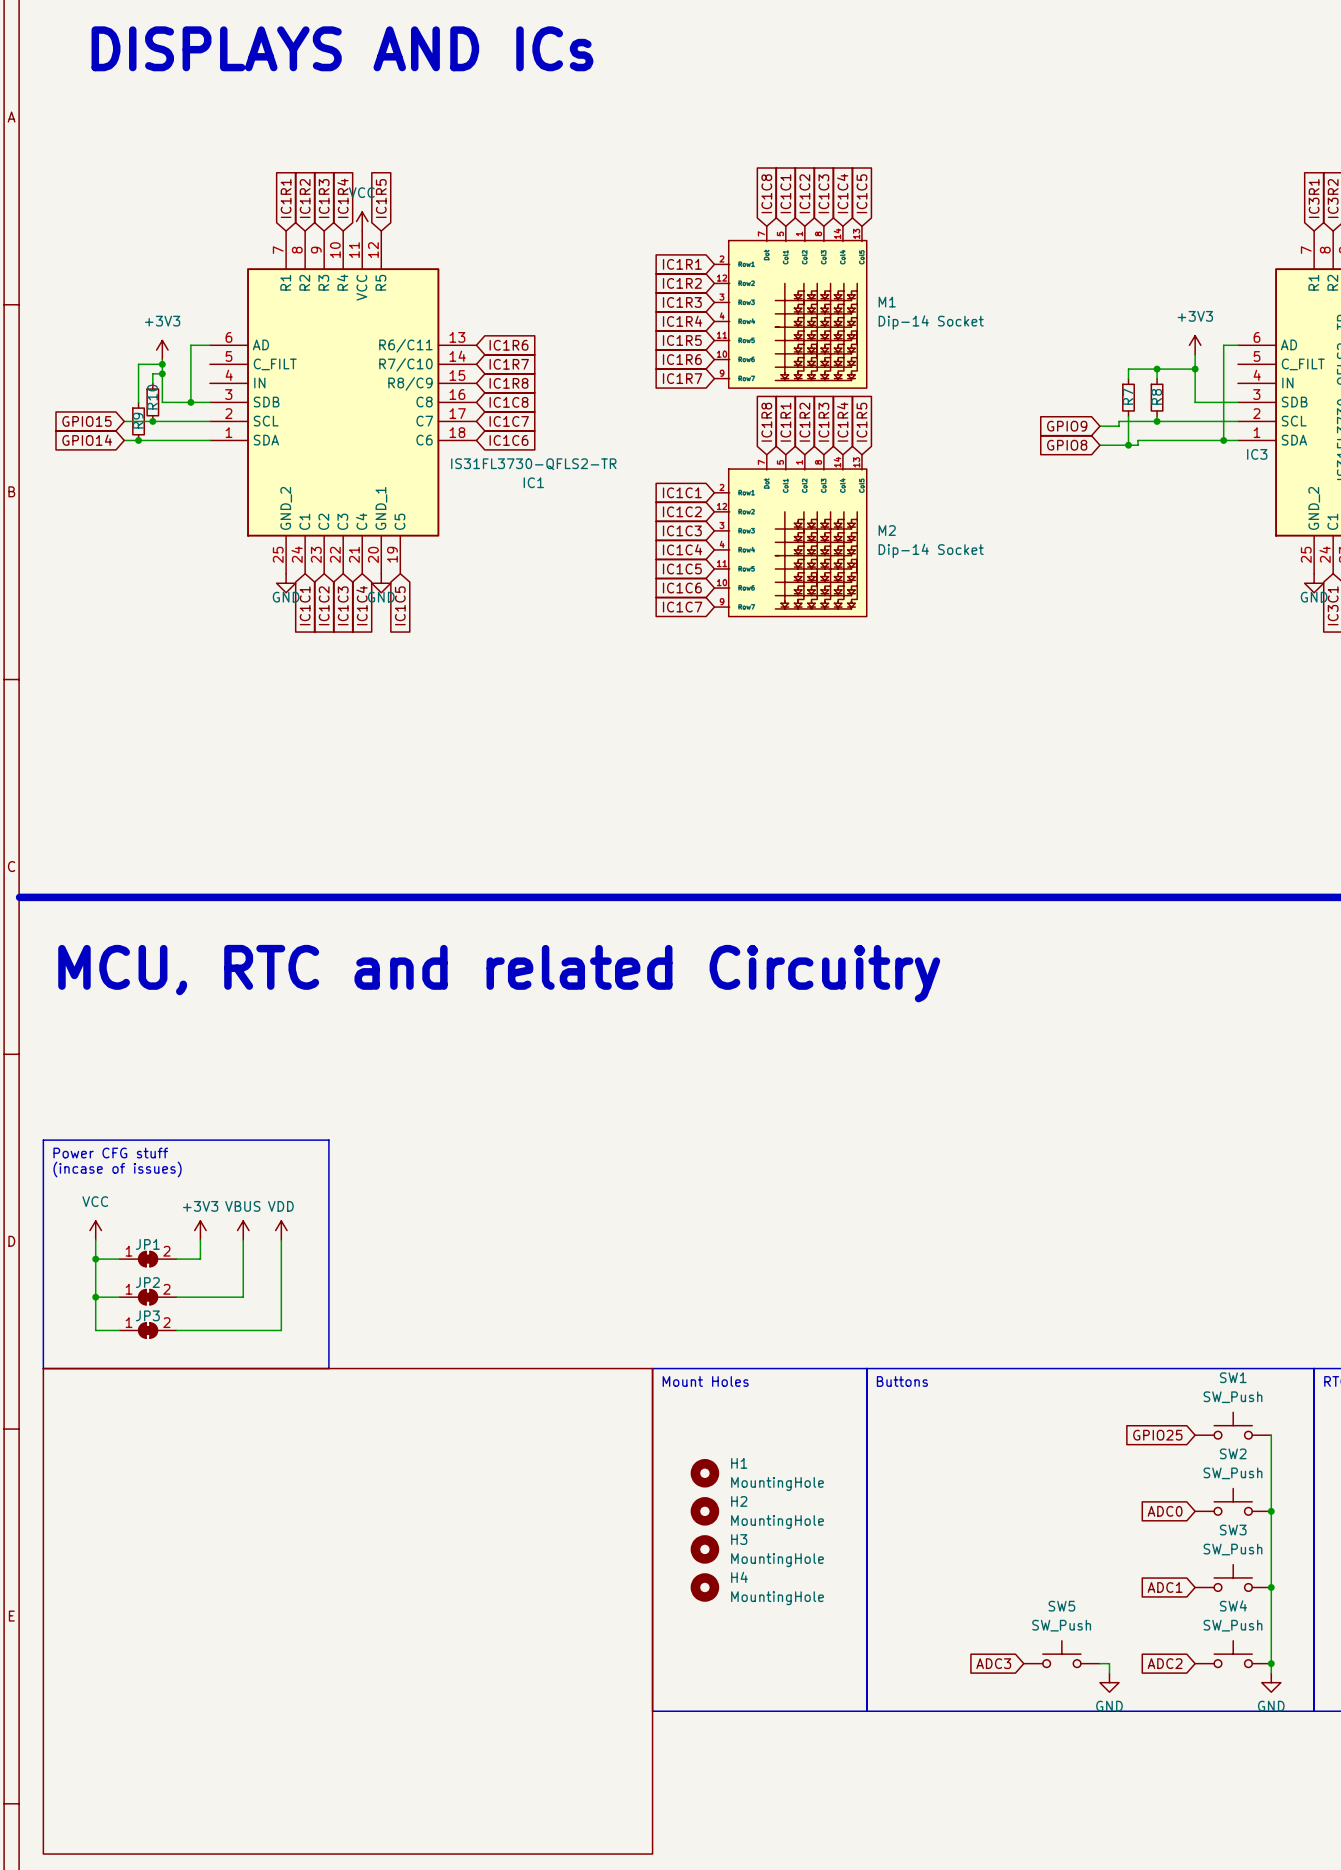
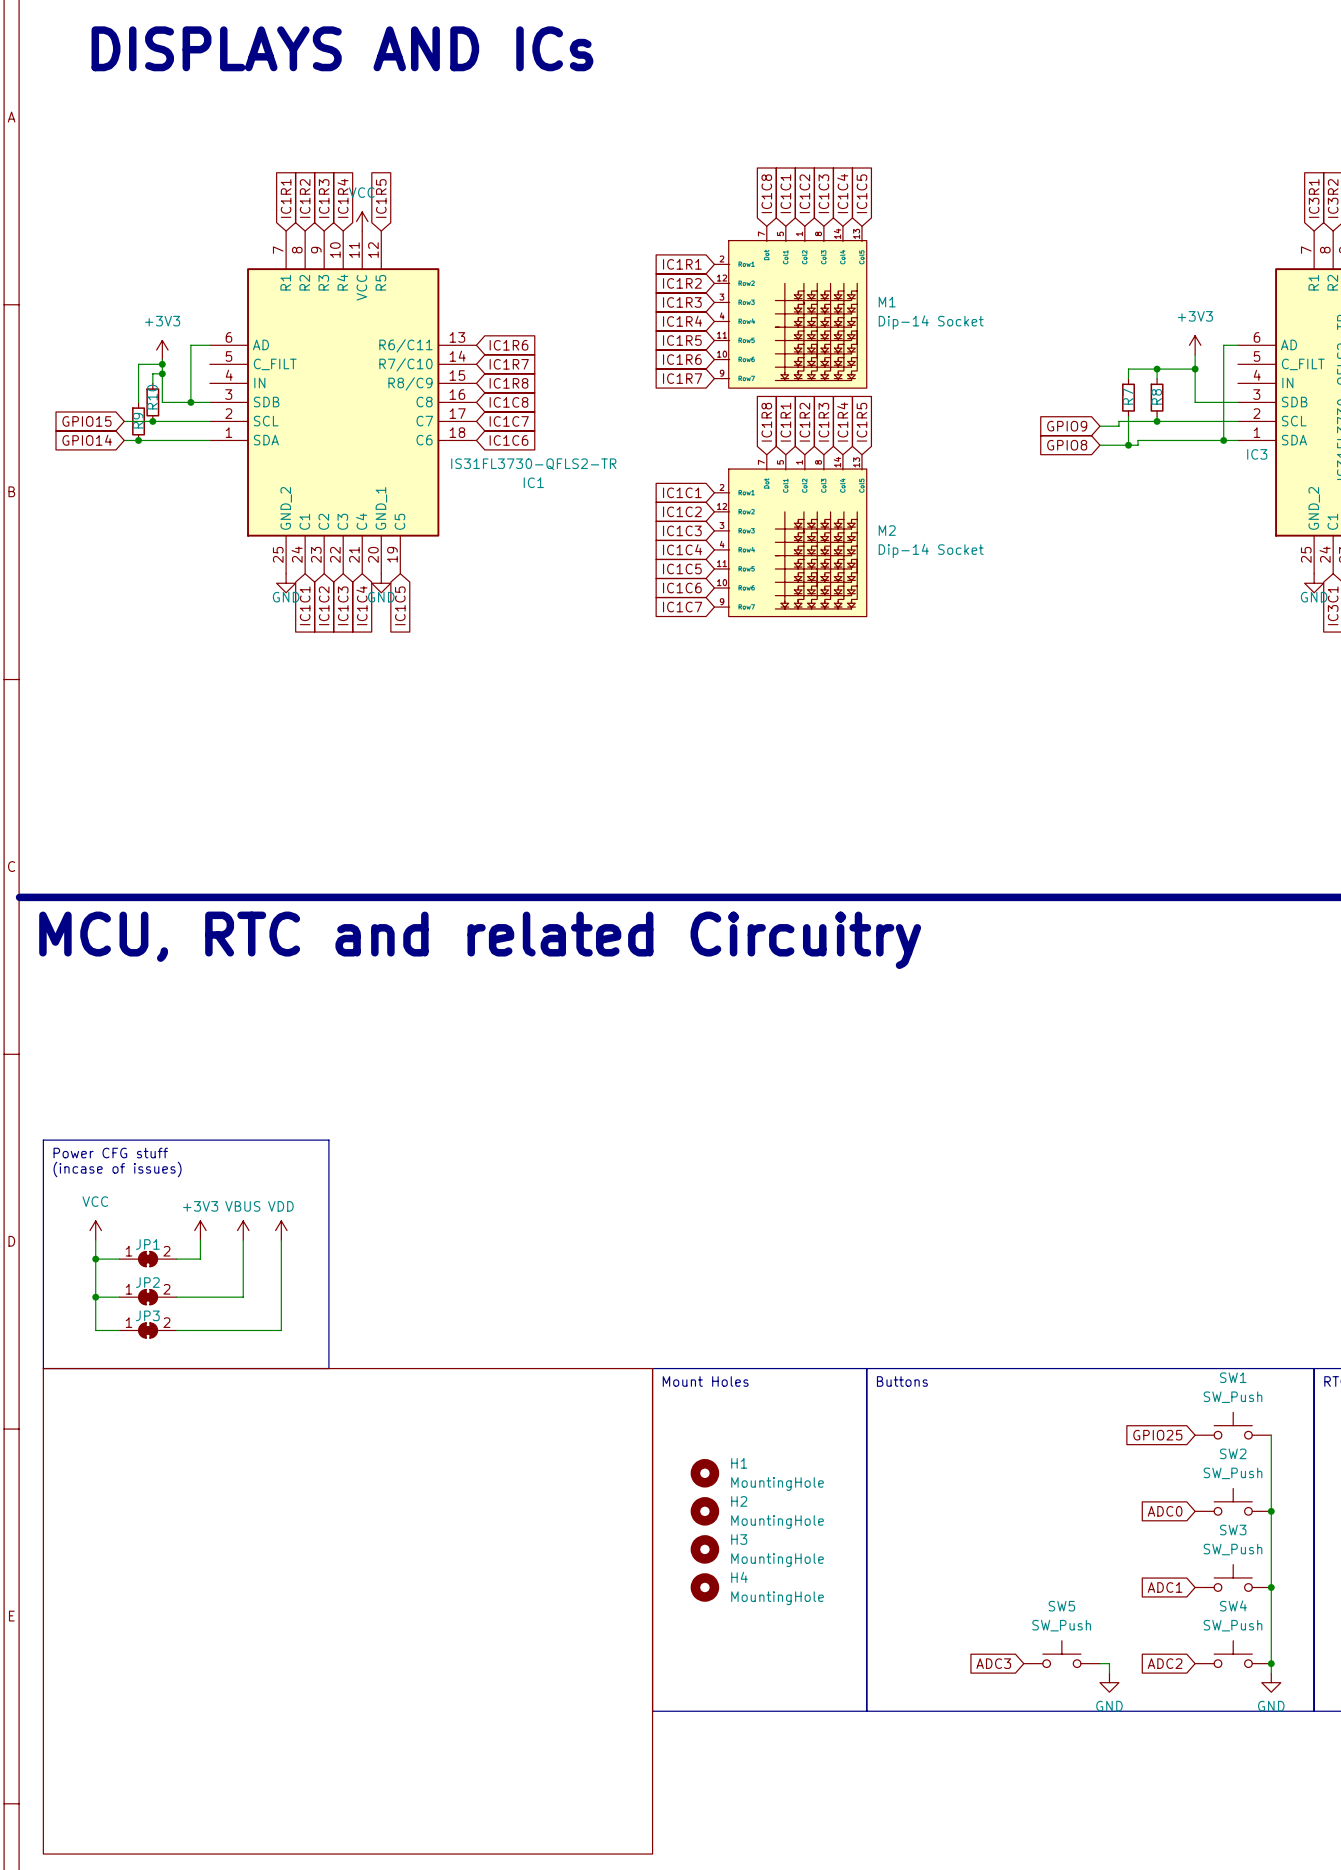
text position: MCU, RTC and related Circuitry (499, 973) -> MCU, RTC and related Circuitry (480, 940)

